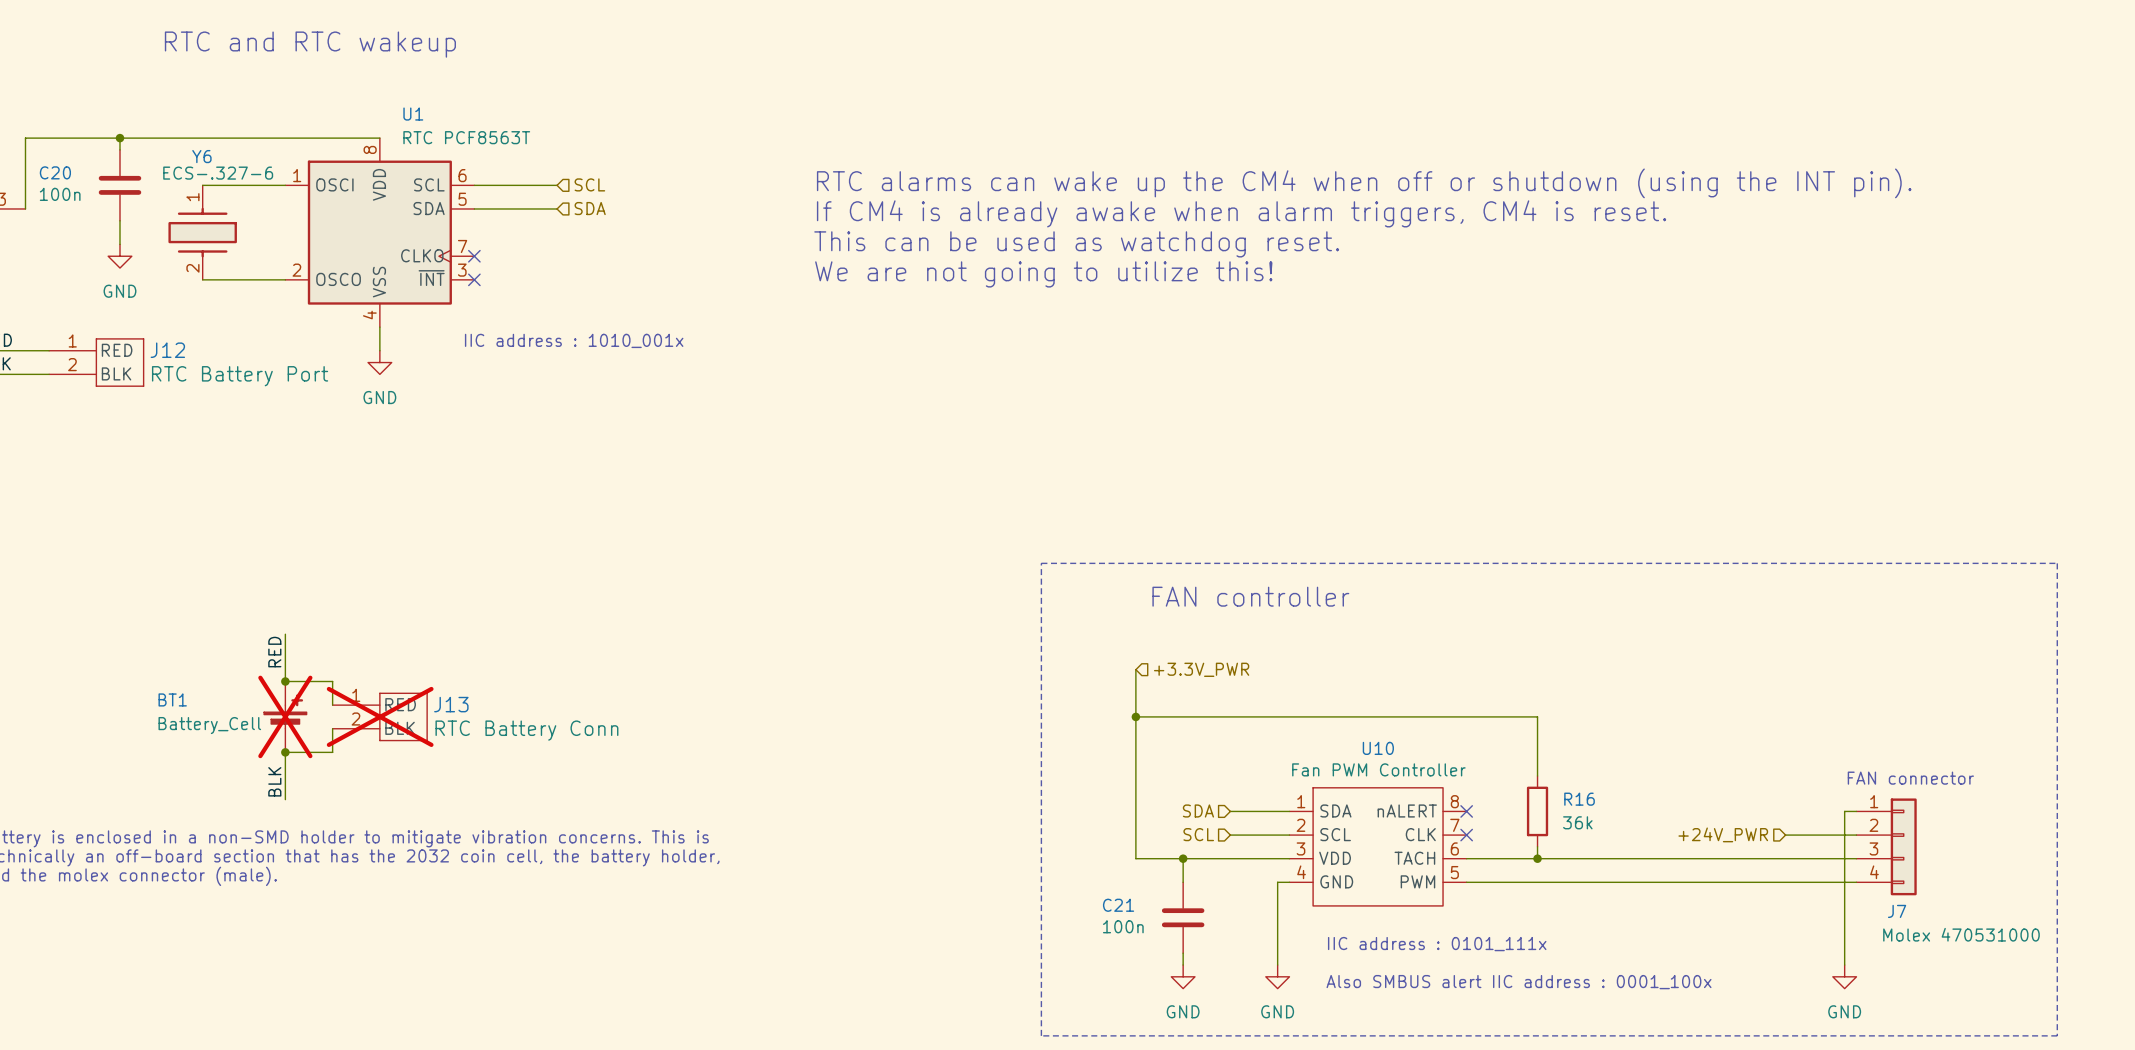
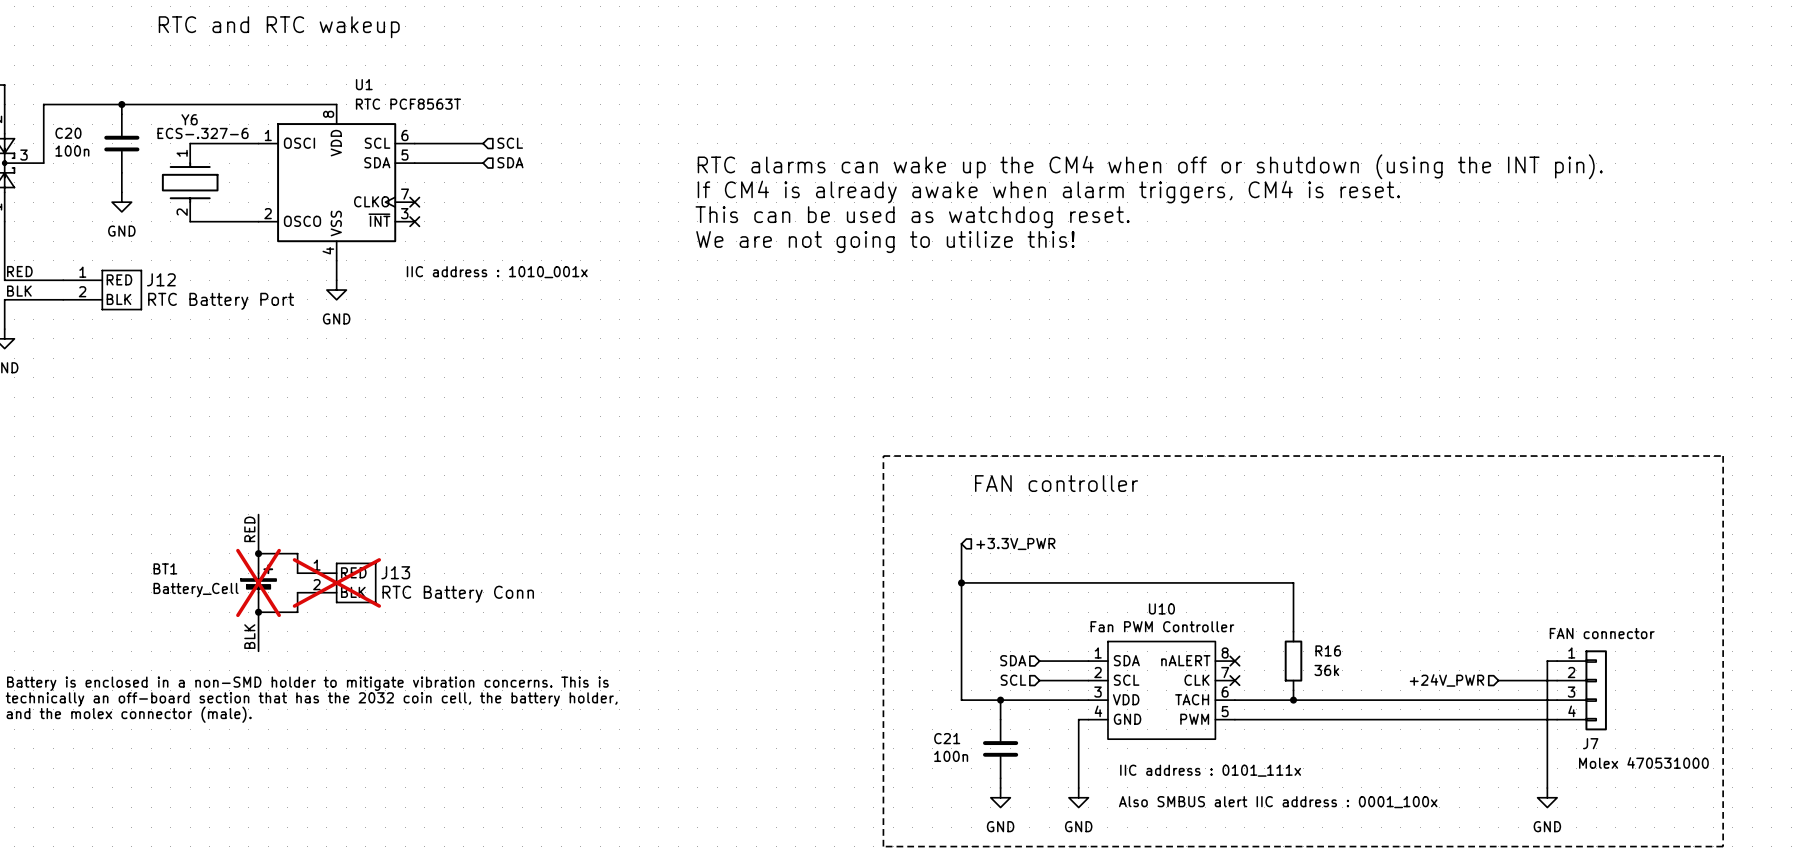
text: RTC alarms can wake up the CM4 when off or shutdown (using the INT pin). (1364, 183) -> none
text: If CM4 is already awake when alarm triggers, CM4 is reset. (1241, 213) -> RTC alarms can wake up the CM4 when off or shutdown (using the INT pin). (1150, 166)
text: This can be used as watchdog reset. (1076, 244) -> If CM4 is already awake when alarm triggers, CM4 is reset. (1048, 191)
text: We are not going to utilize this! (1043, 274) -> This can be used as watchdog reset. (912, 217)
text: none -> We are not going to utilize this! (885, 242)

